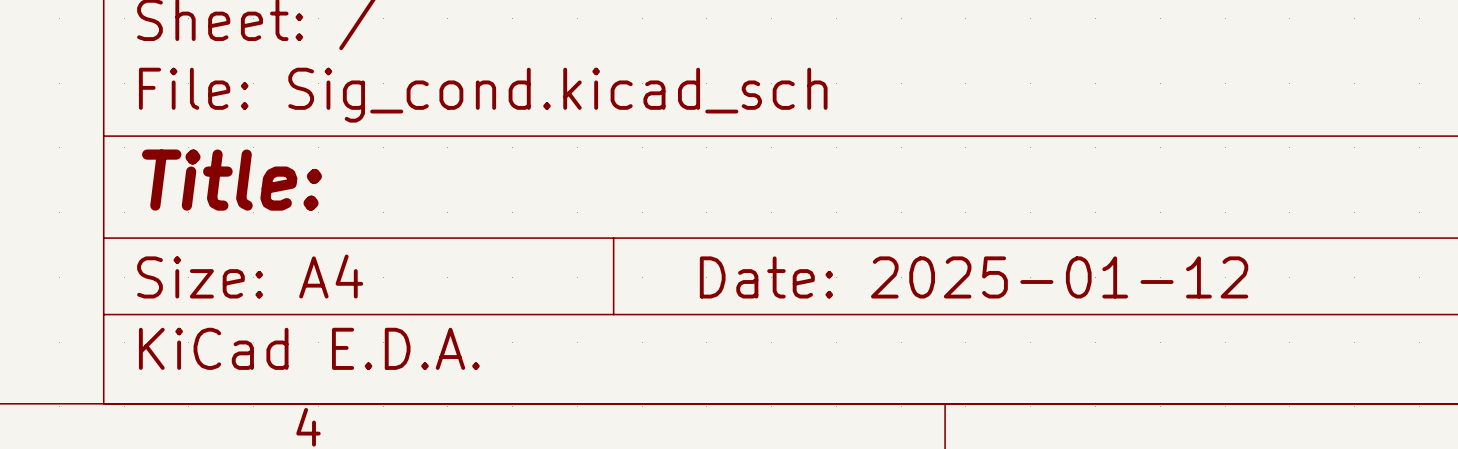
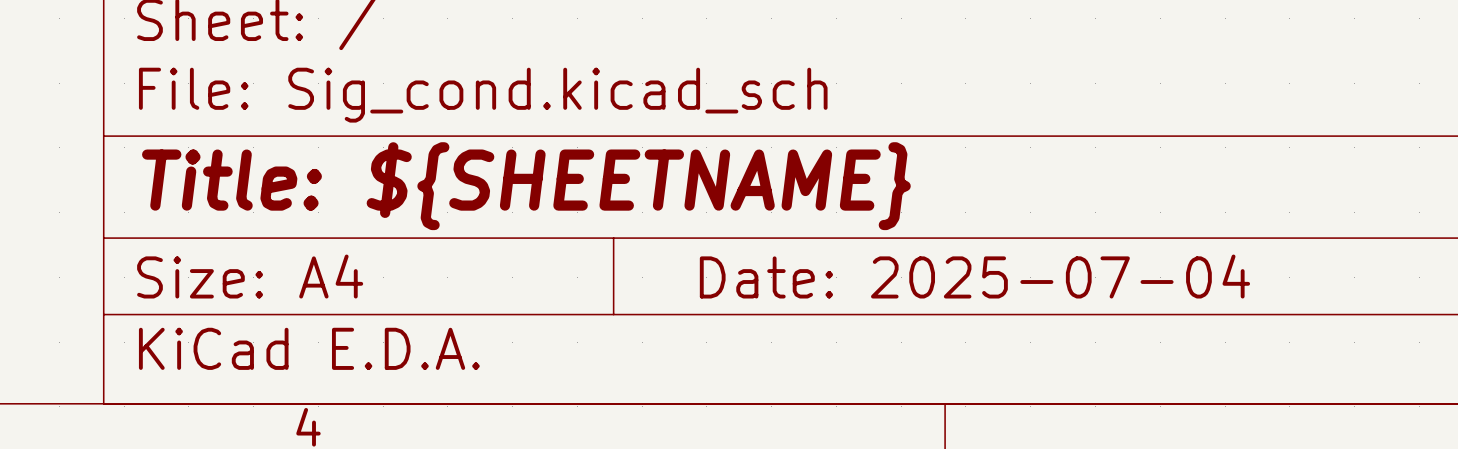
title block: Title: (231, 180) -> Title: ${SHEETNAME} (526, 186)
title block: Date: 2025-01-12 (974, 277) -> Date: 2025-07-04 (974, 276)

